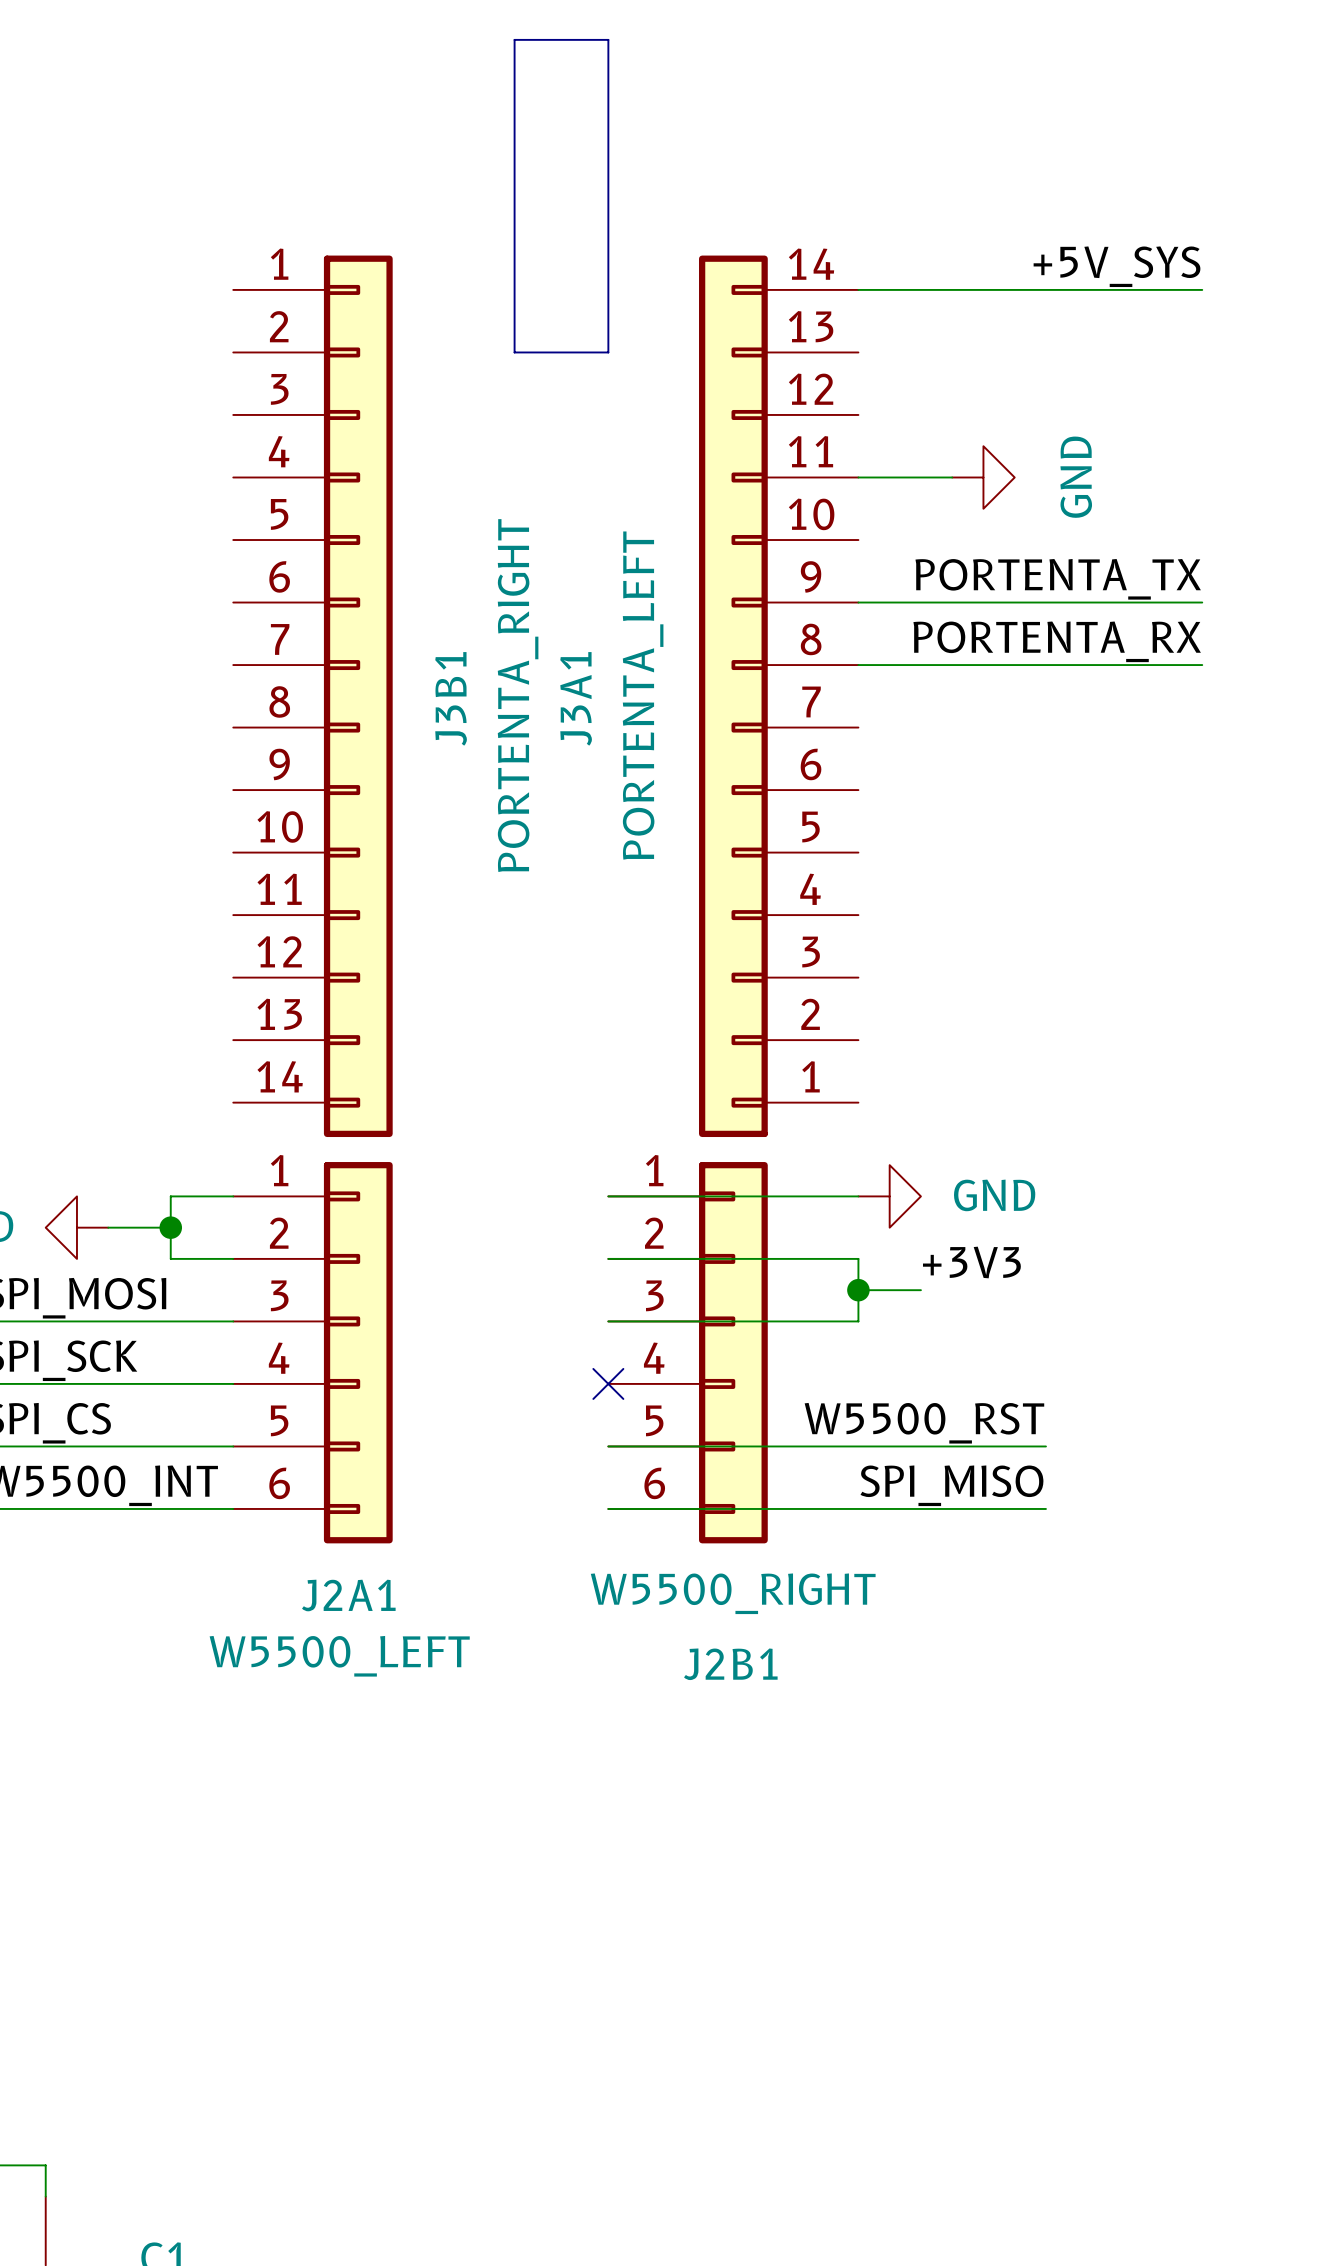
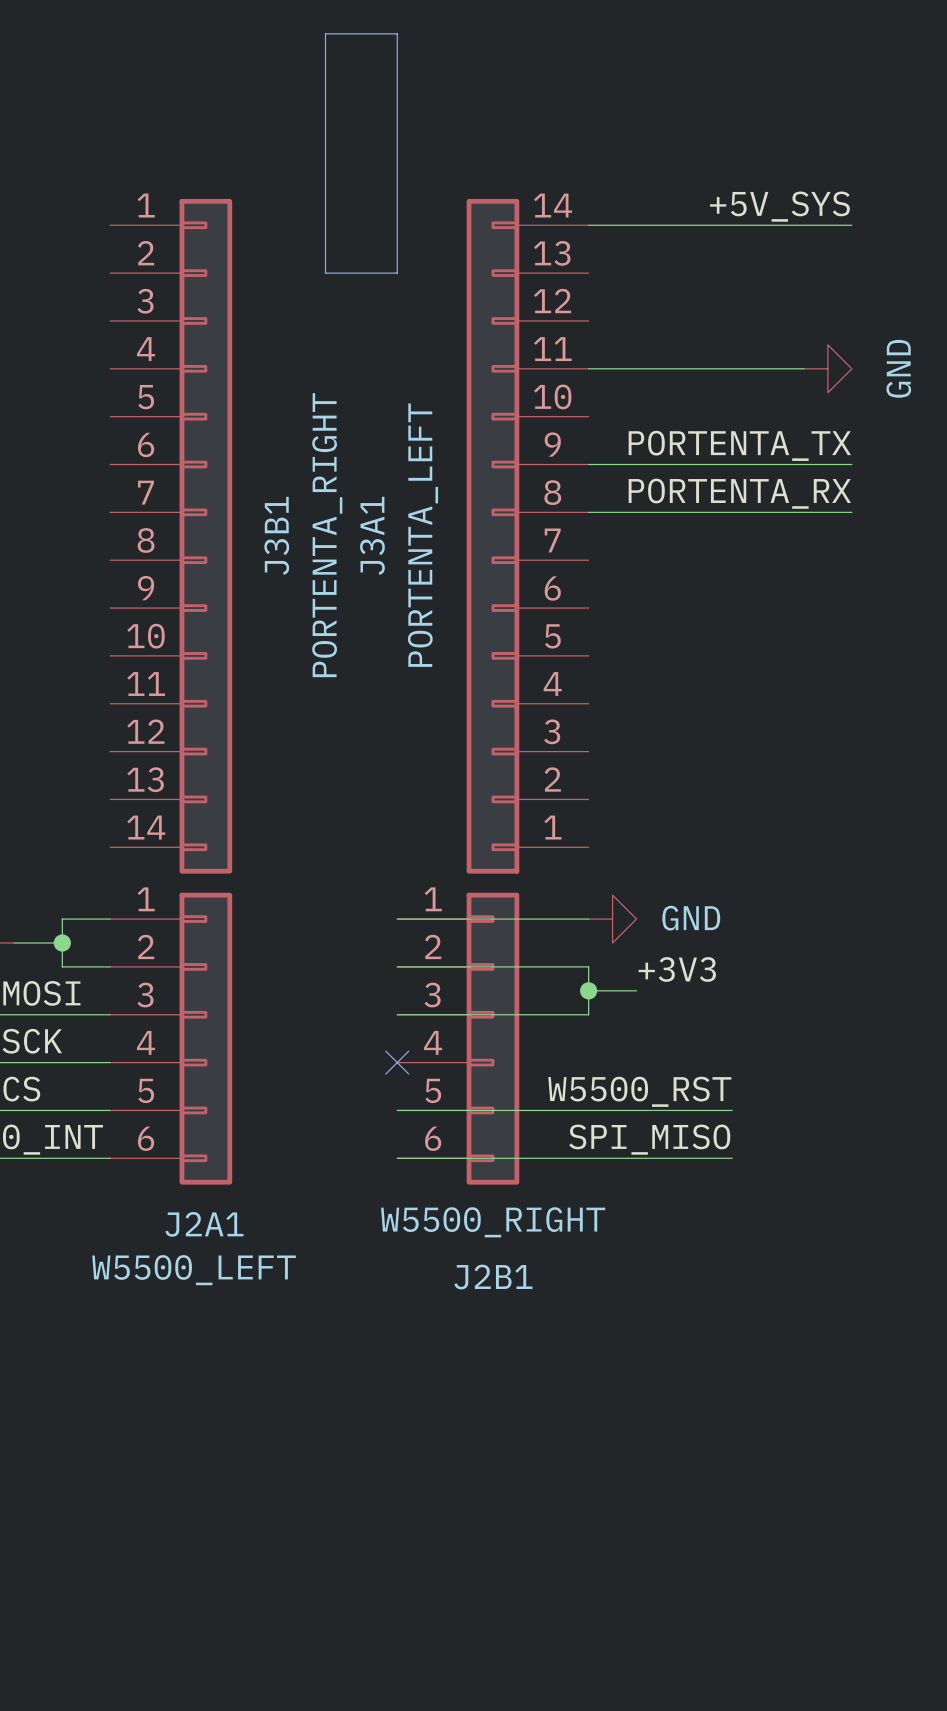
wire: none -> (660, 368) (803, 368)
power symbol position: GND (983, 477) -> GND (827, 368)

